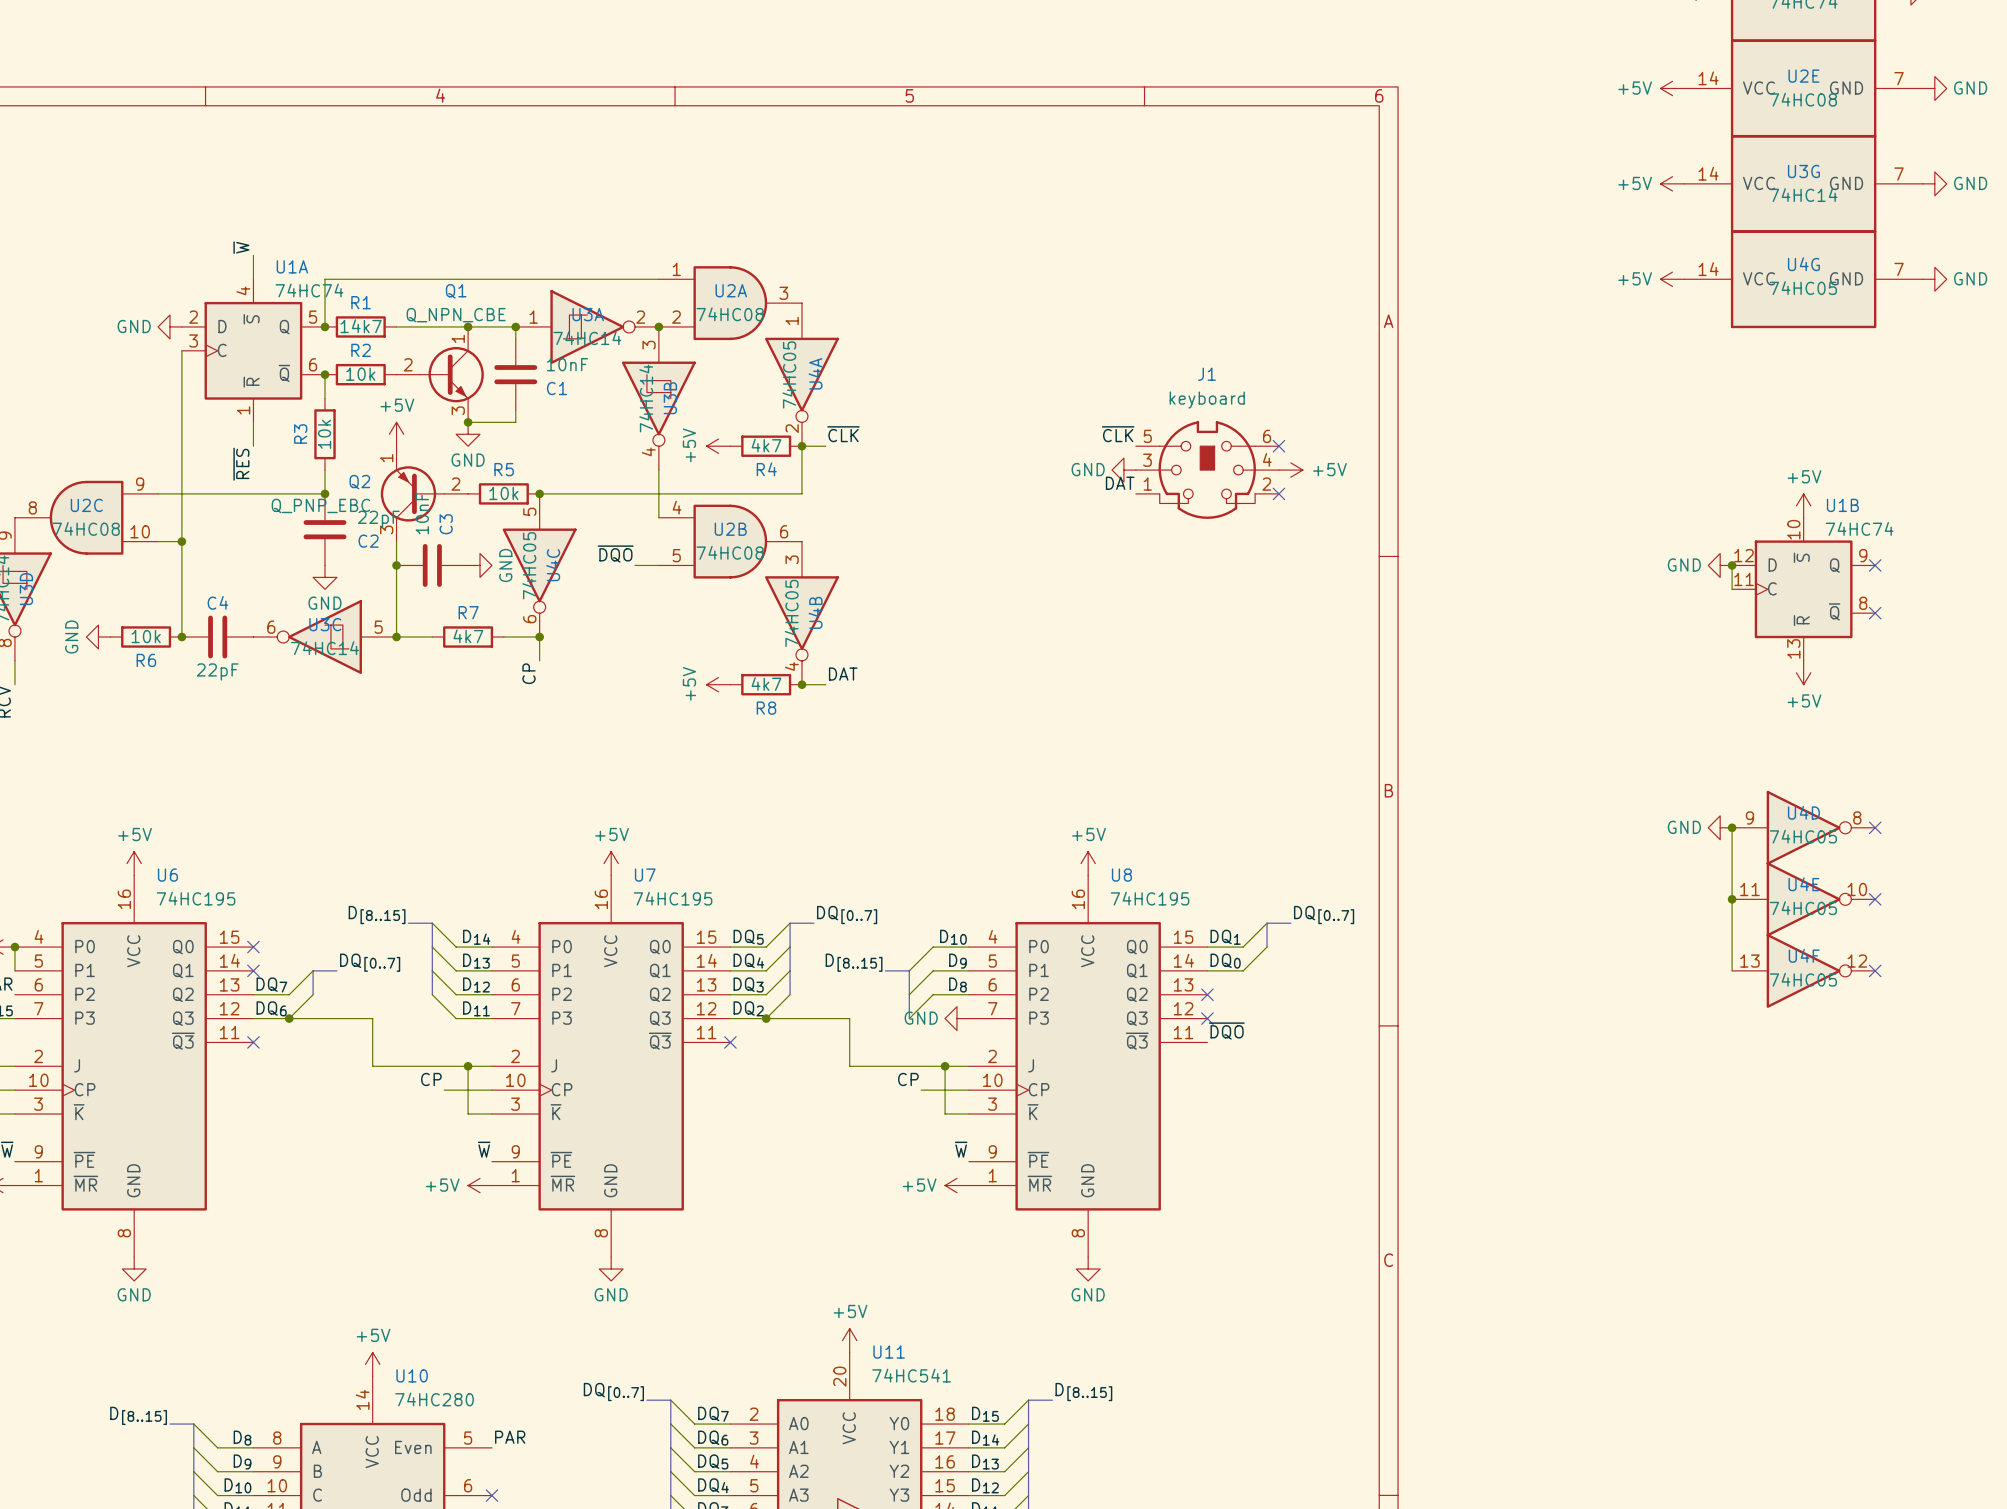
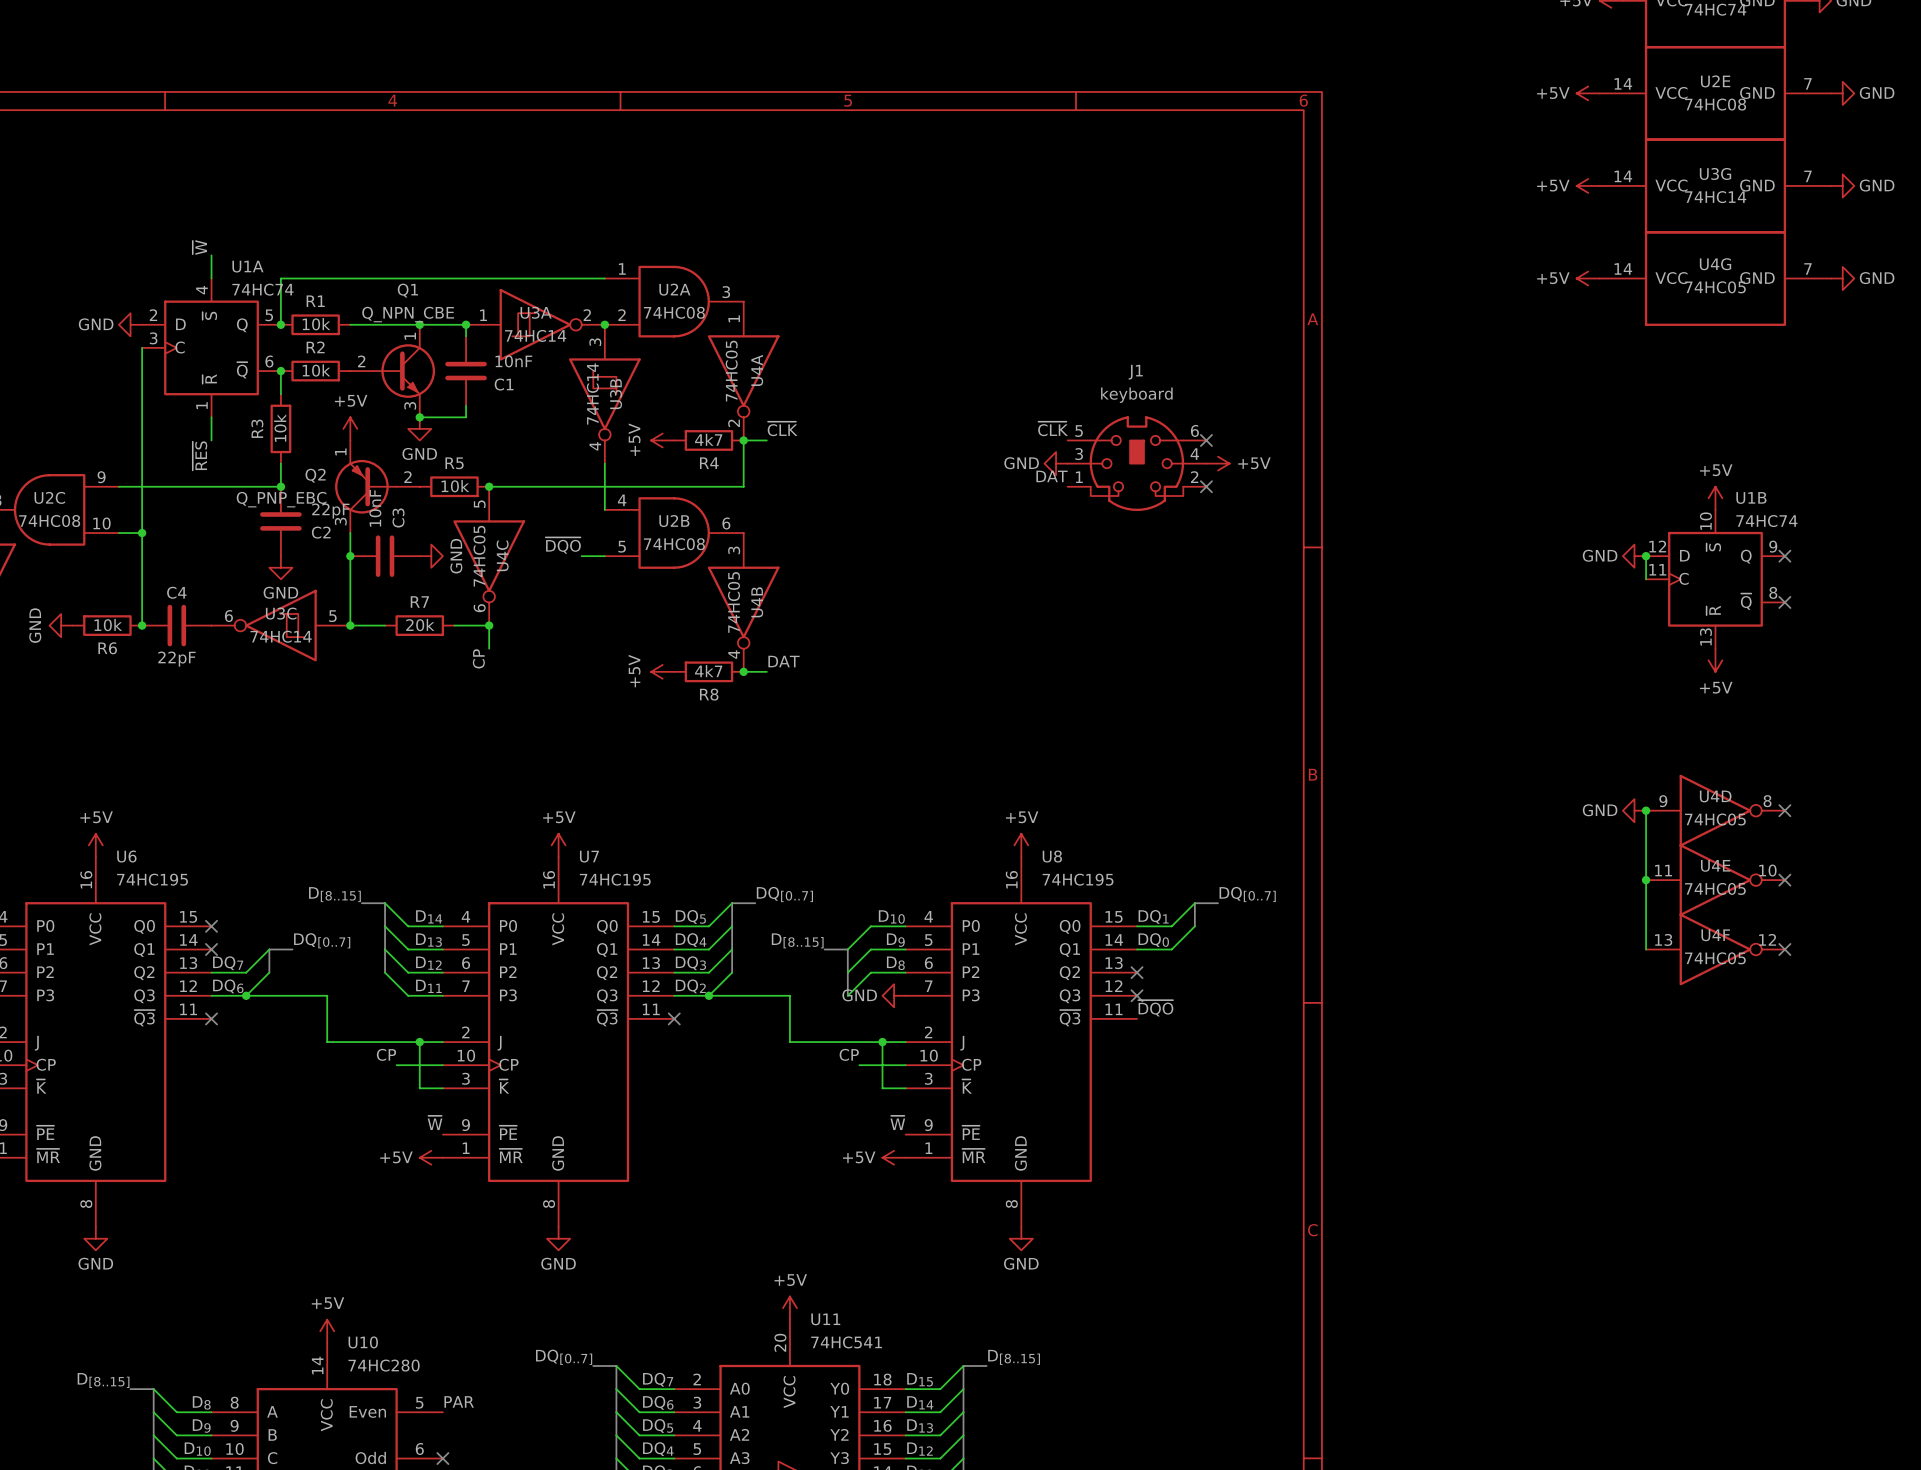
R1 value: 14k7 (361, 326) -> 10k (316, 324)
R7 value: 4k7 (468, 636) -> 20k (420, 625)

